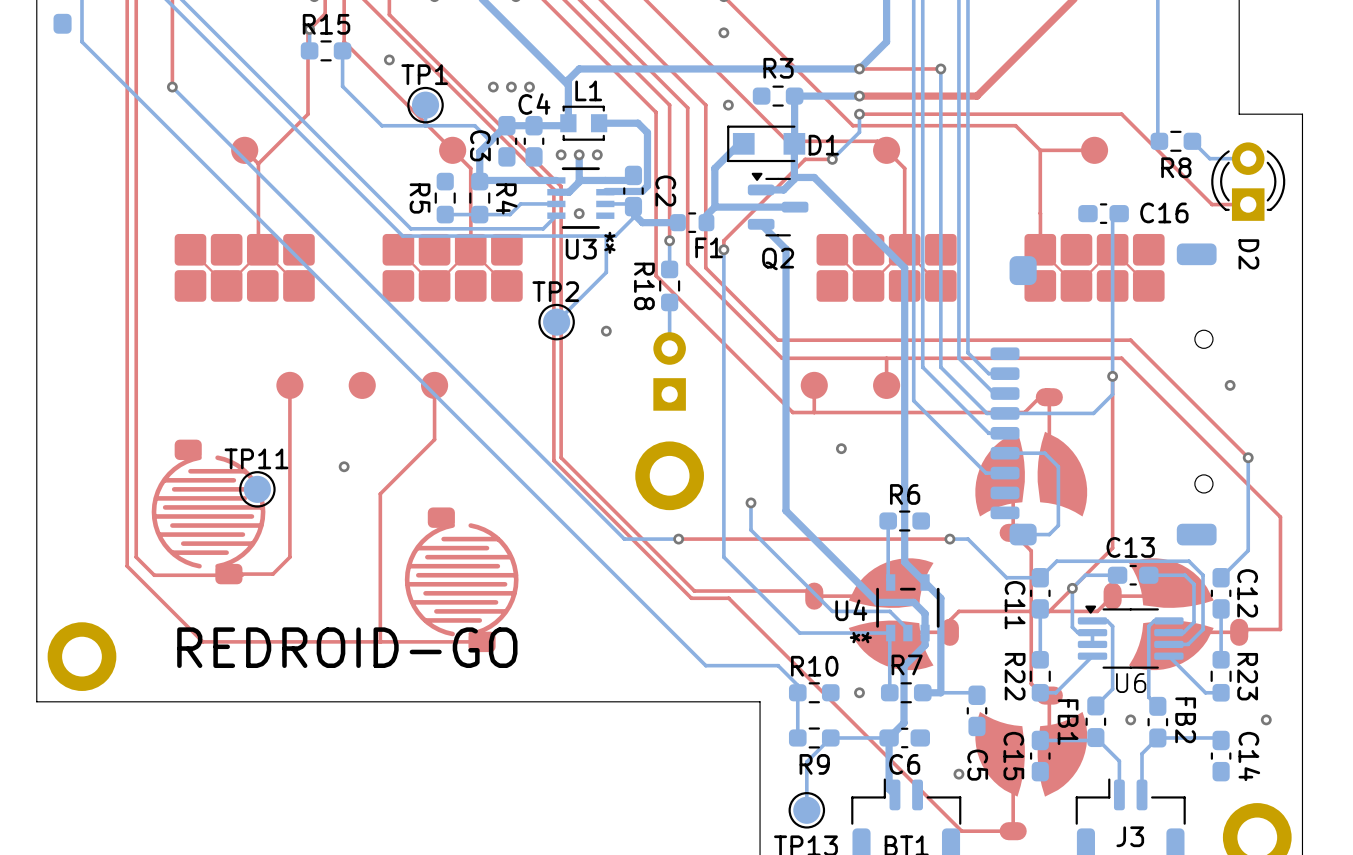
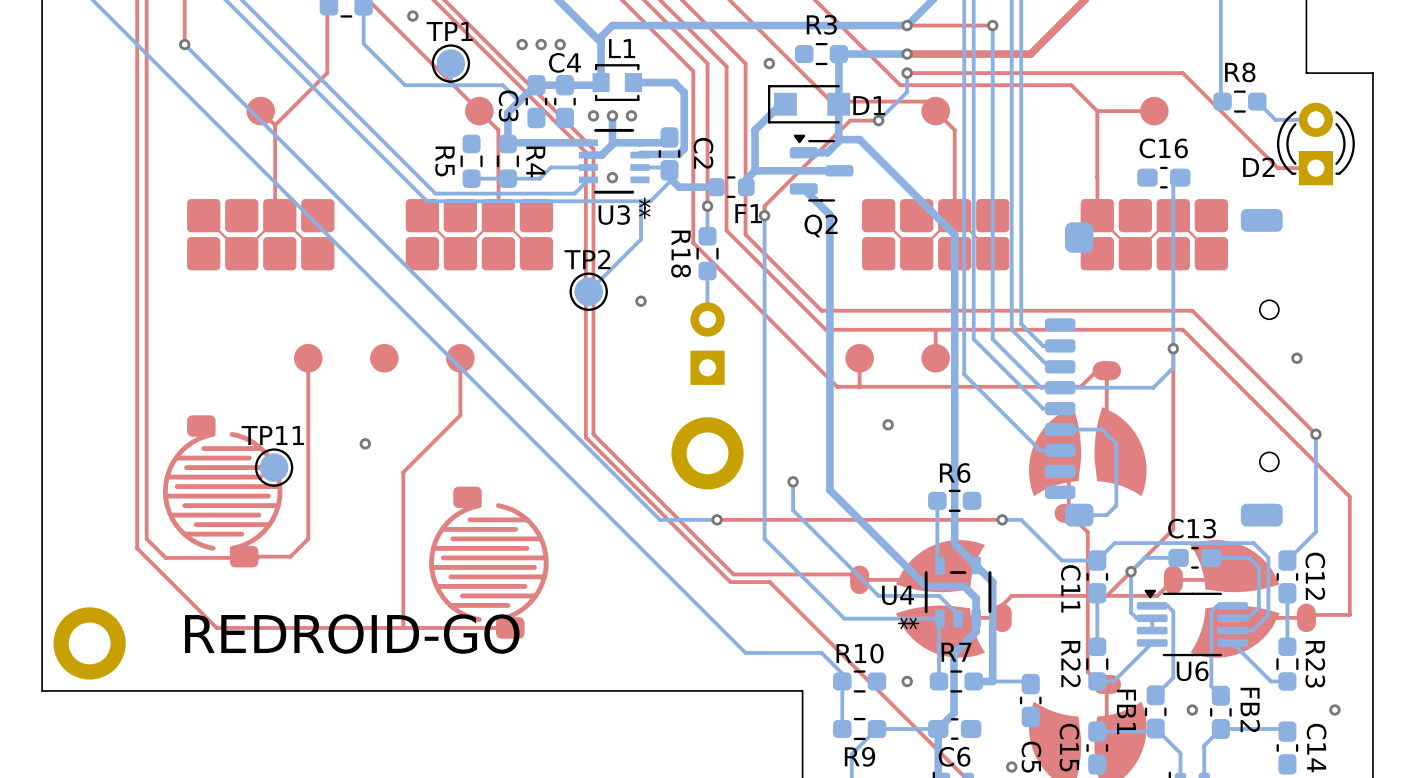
R8 name position: R8 (1176, 167) -> R8 (1240, 72)
C16 name position: C16 (1164, 212) -> C16 (1163, 148)
D2 name rotation: 0° (1248, 254) -> 90° counterclockwise (1258, 167)
D2 name position: D2 (1248, 254) -> D2 (1258, 167)

